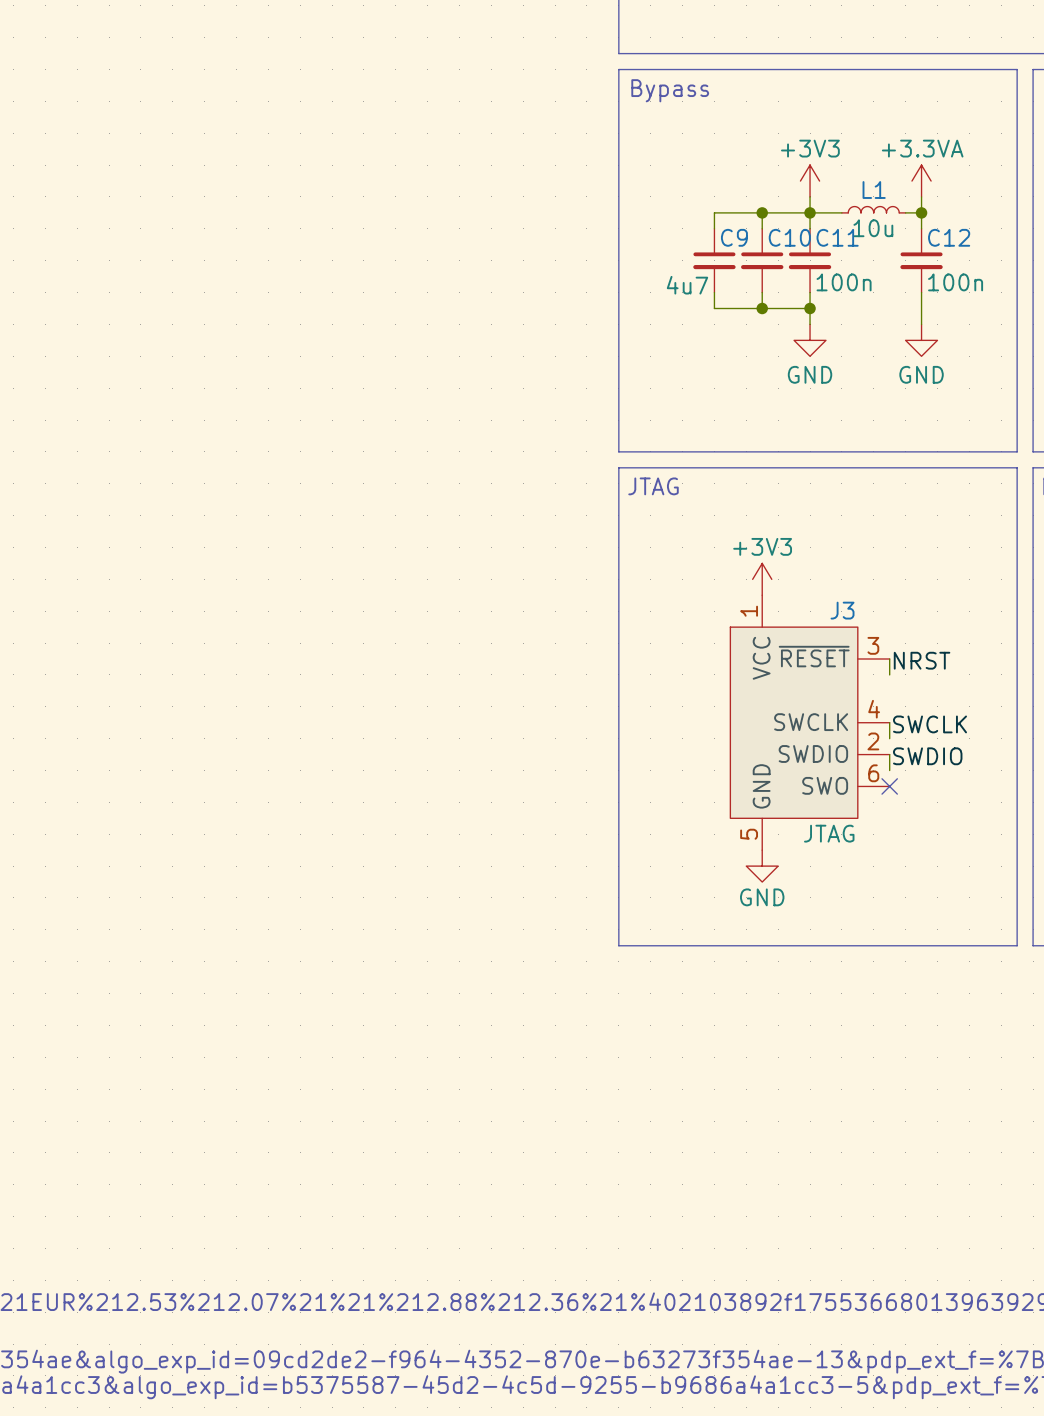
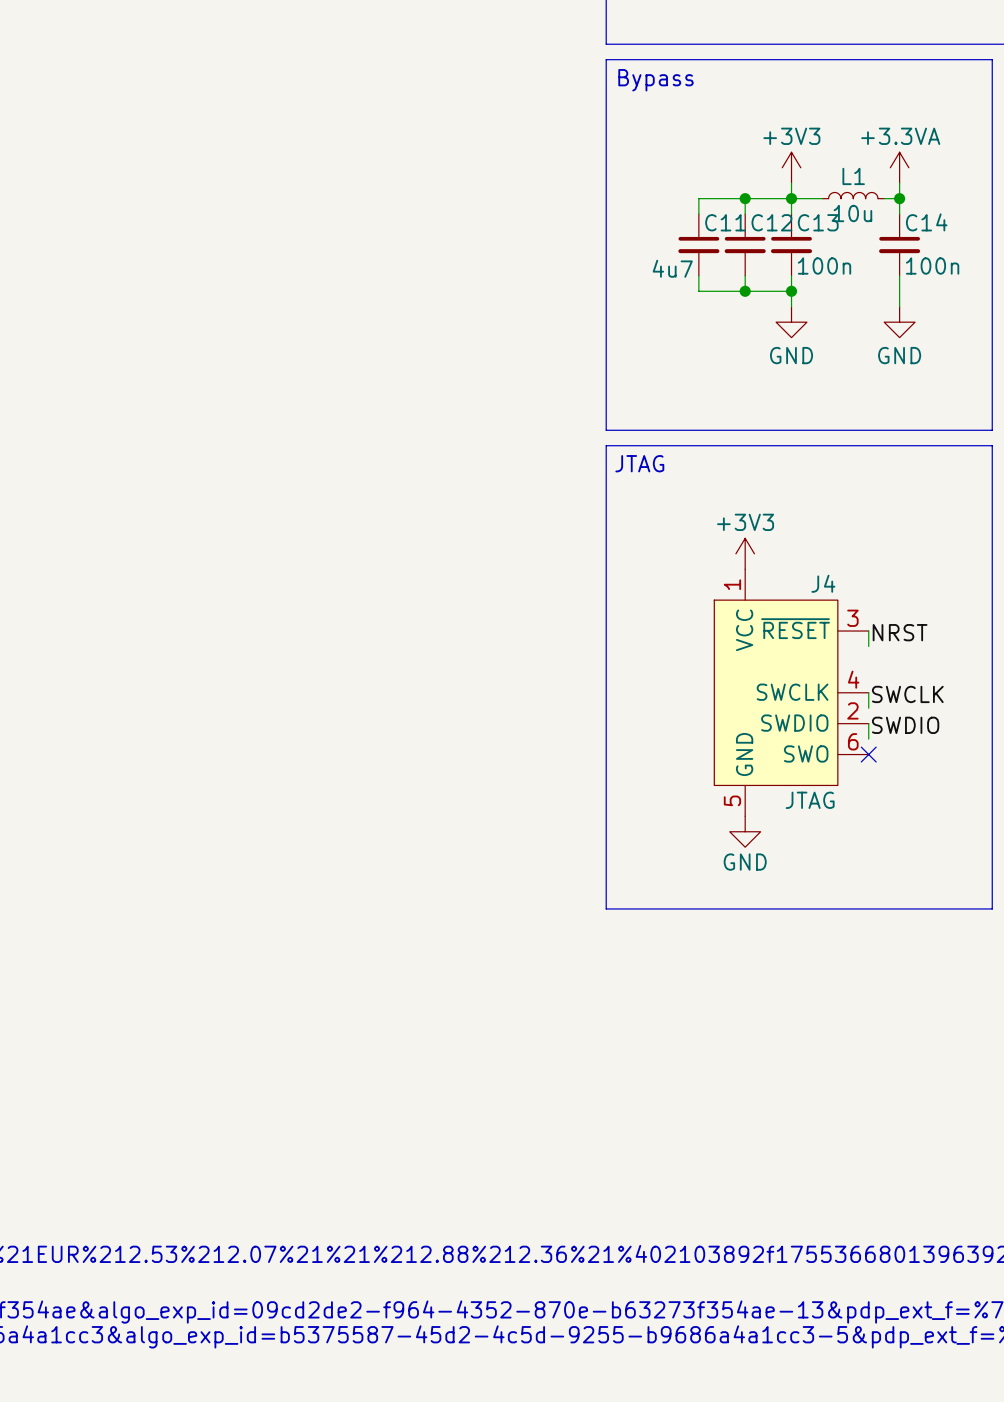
C9 name: C9 (734, 237) -> C11 (725, 222)
C10 name: C10 (789, 237) -> C12 (771, 222)
C11 name: C11 (837, 237) -> C13 (818, 222)
C12 name: C12 (949, 237) -> C14 (926, 222)
J3 name: J3 (842, 610) -> J4 (823, 583)

